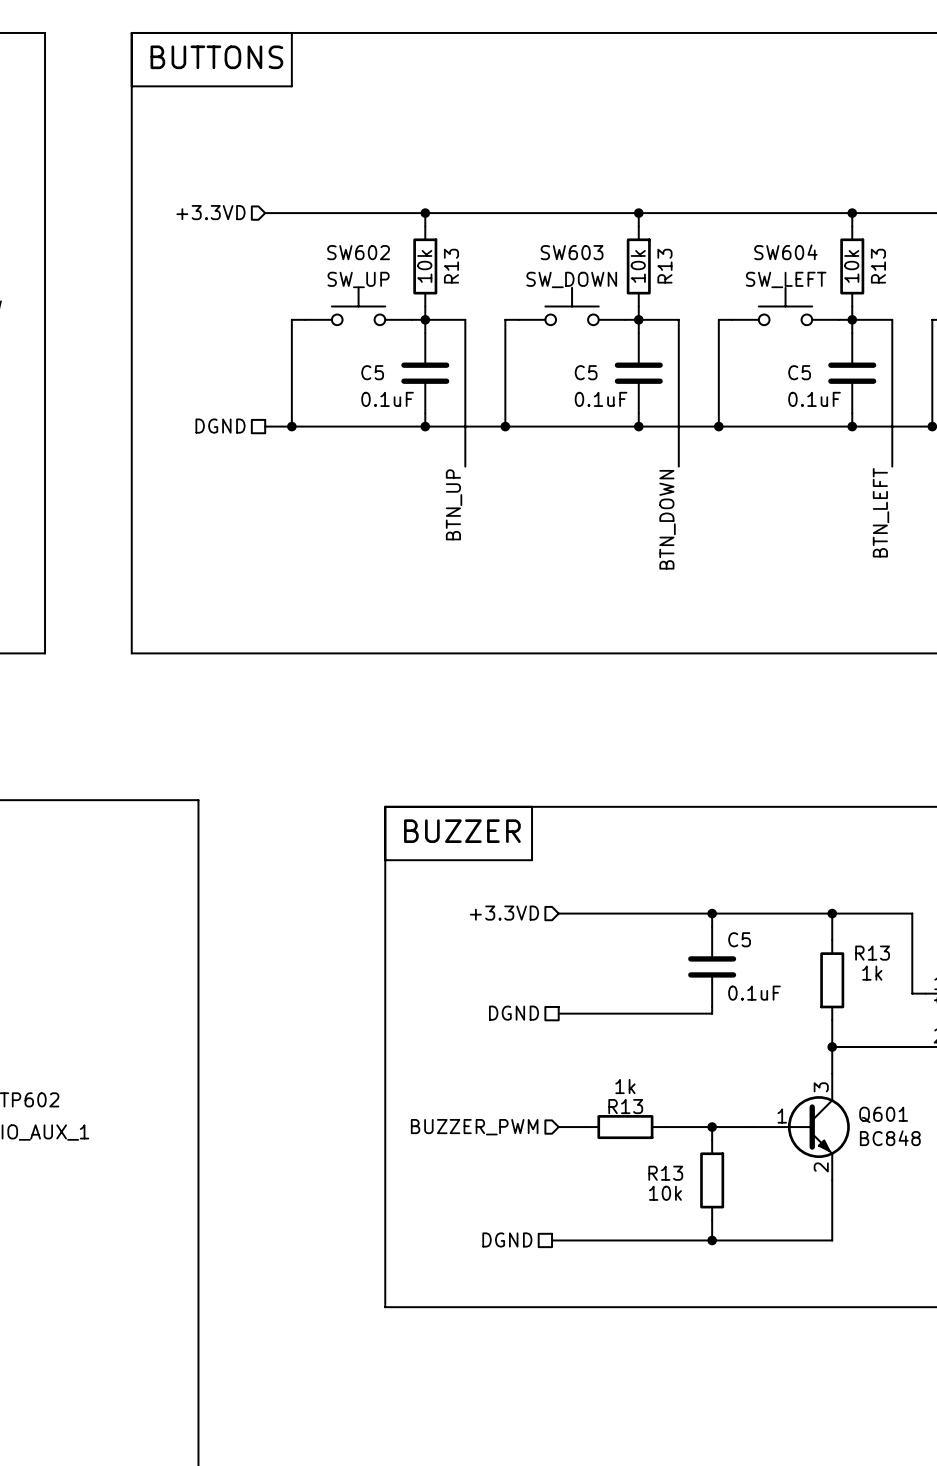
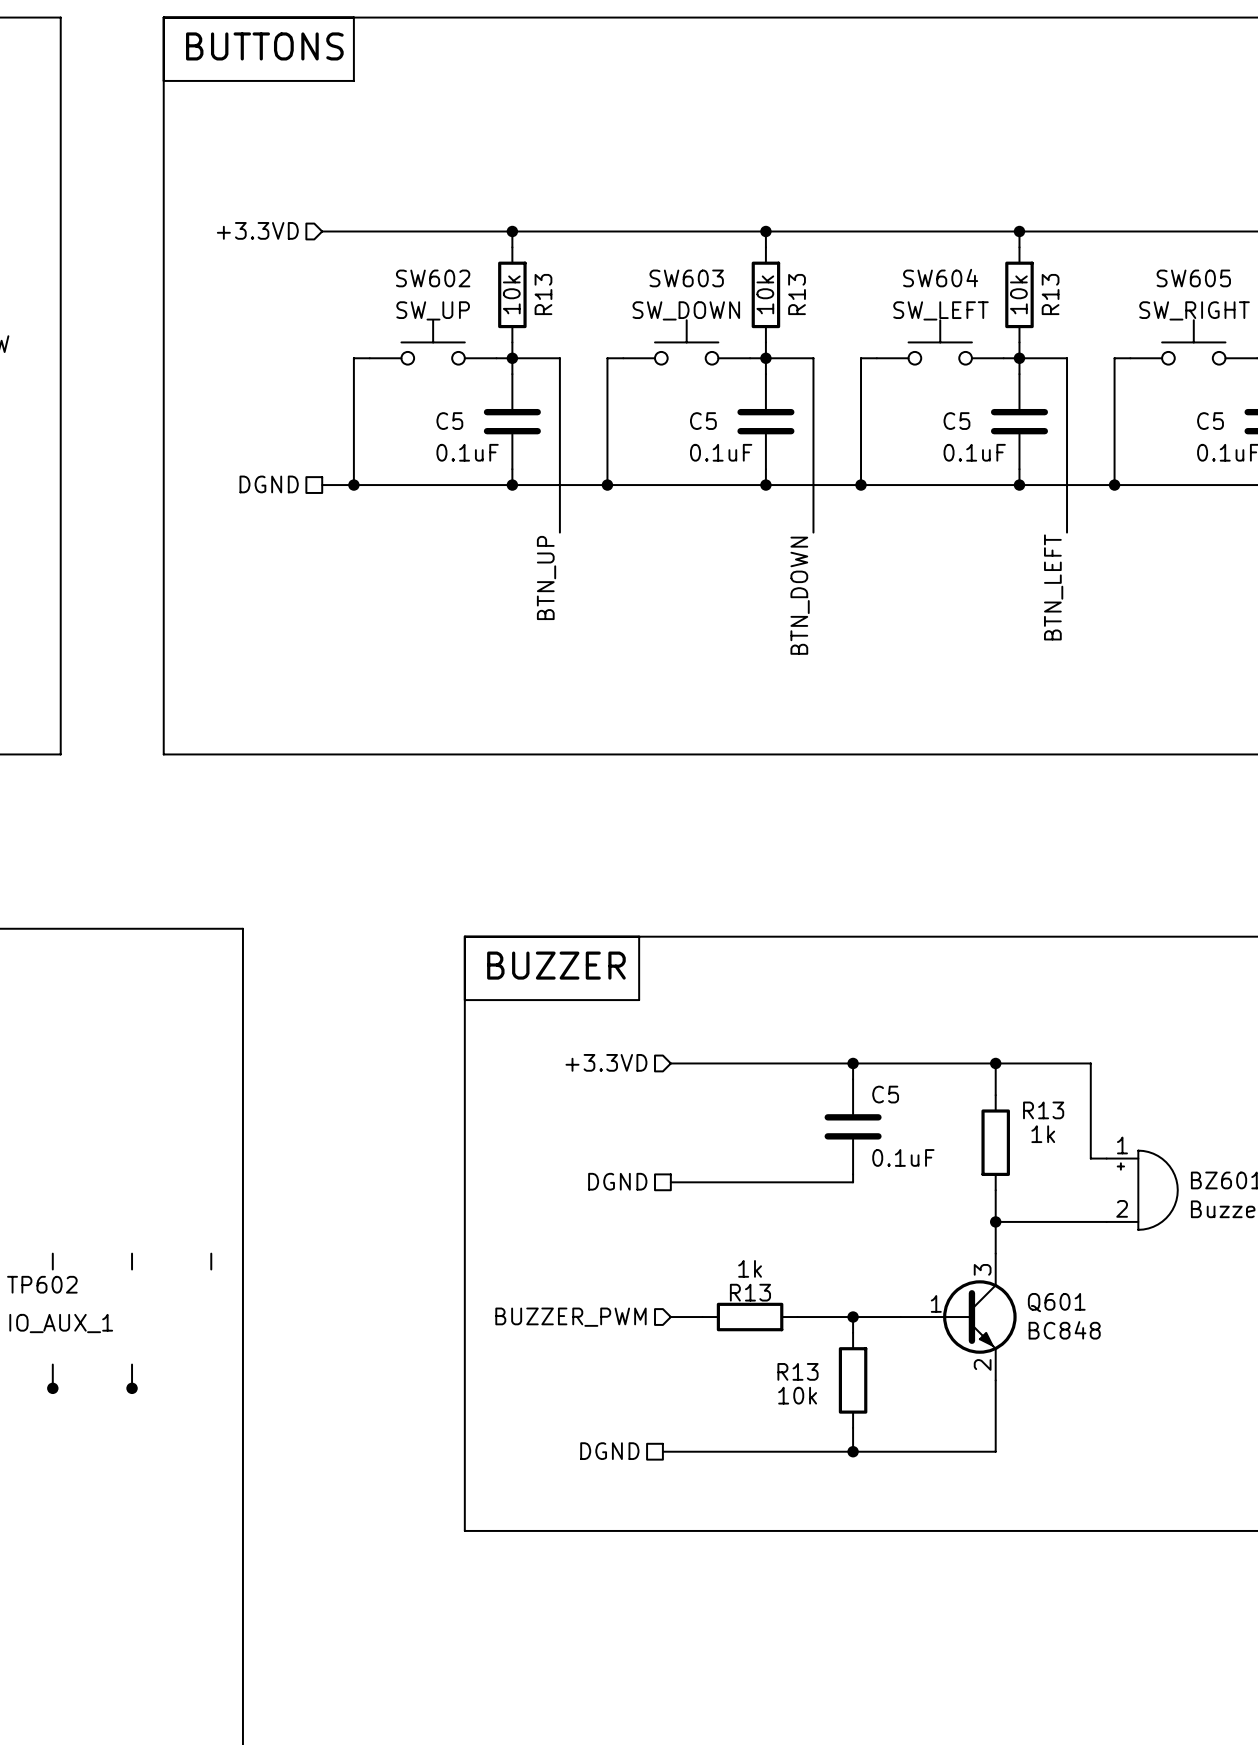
wire: none -> (52, 1253) (52, 1269)
wire: none -> (132, 1253) (132, 1269)
wire: none -> (211, 1253) (211, 1269)
wire: none -> (52, 1364) (52, 1388)
wire: none -> (132, 1364) (132, 1388)
junction: none -> (52, 1388)
junction: none -> (132, 1388)

